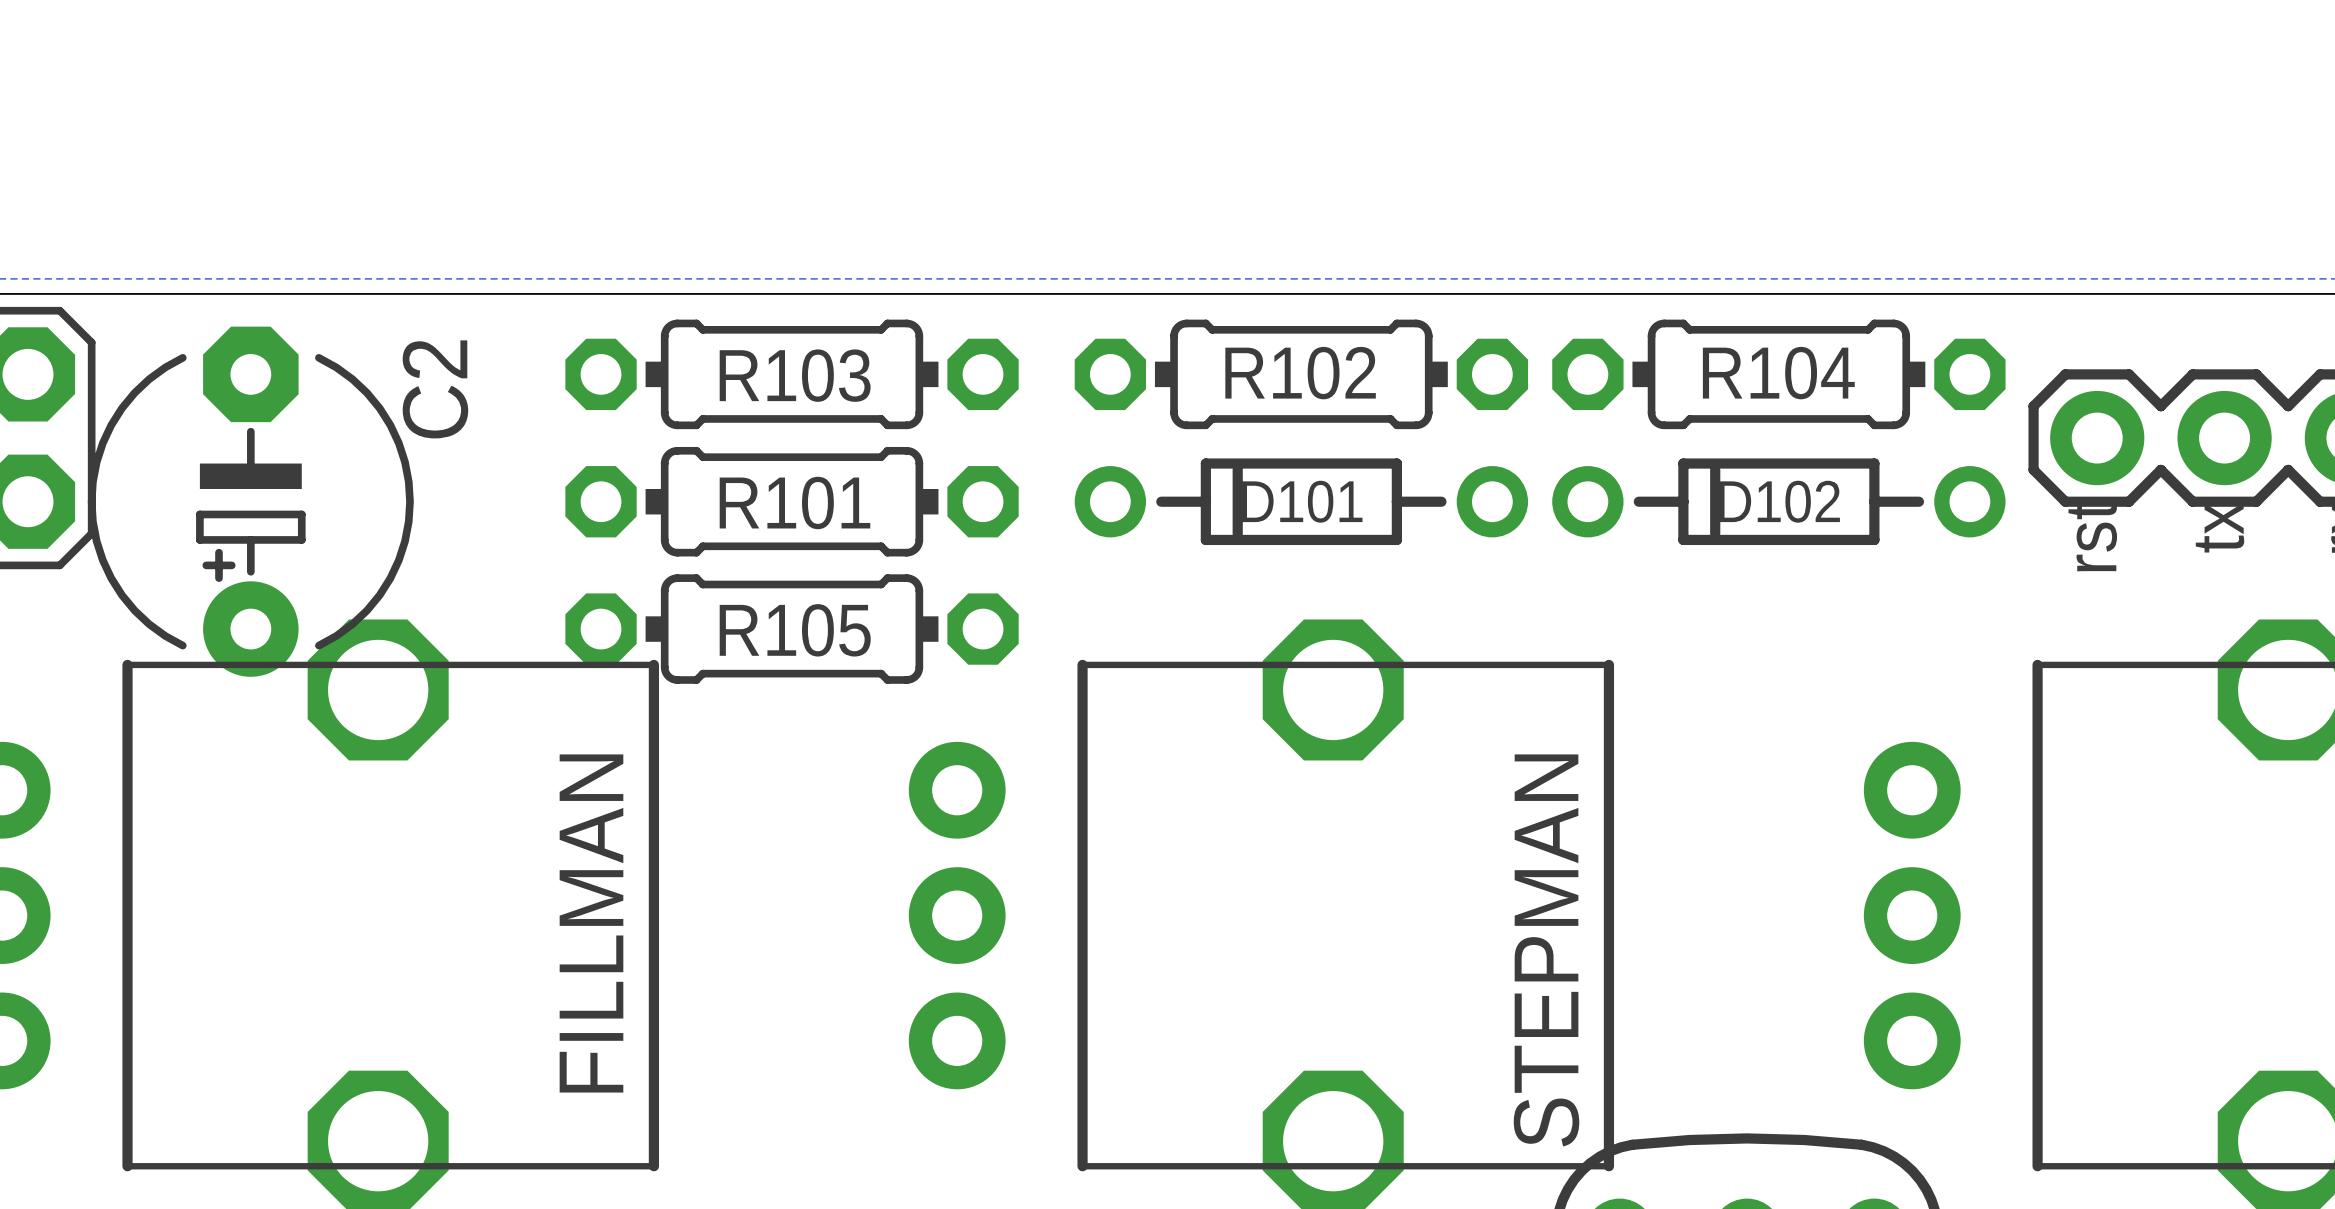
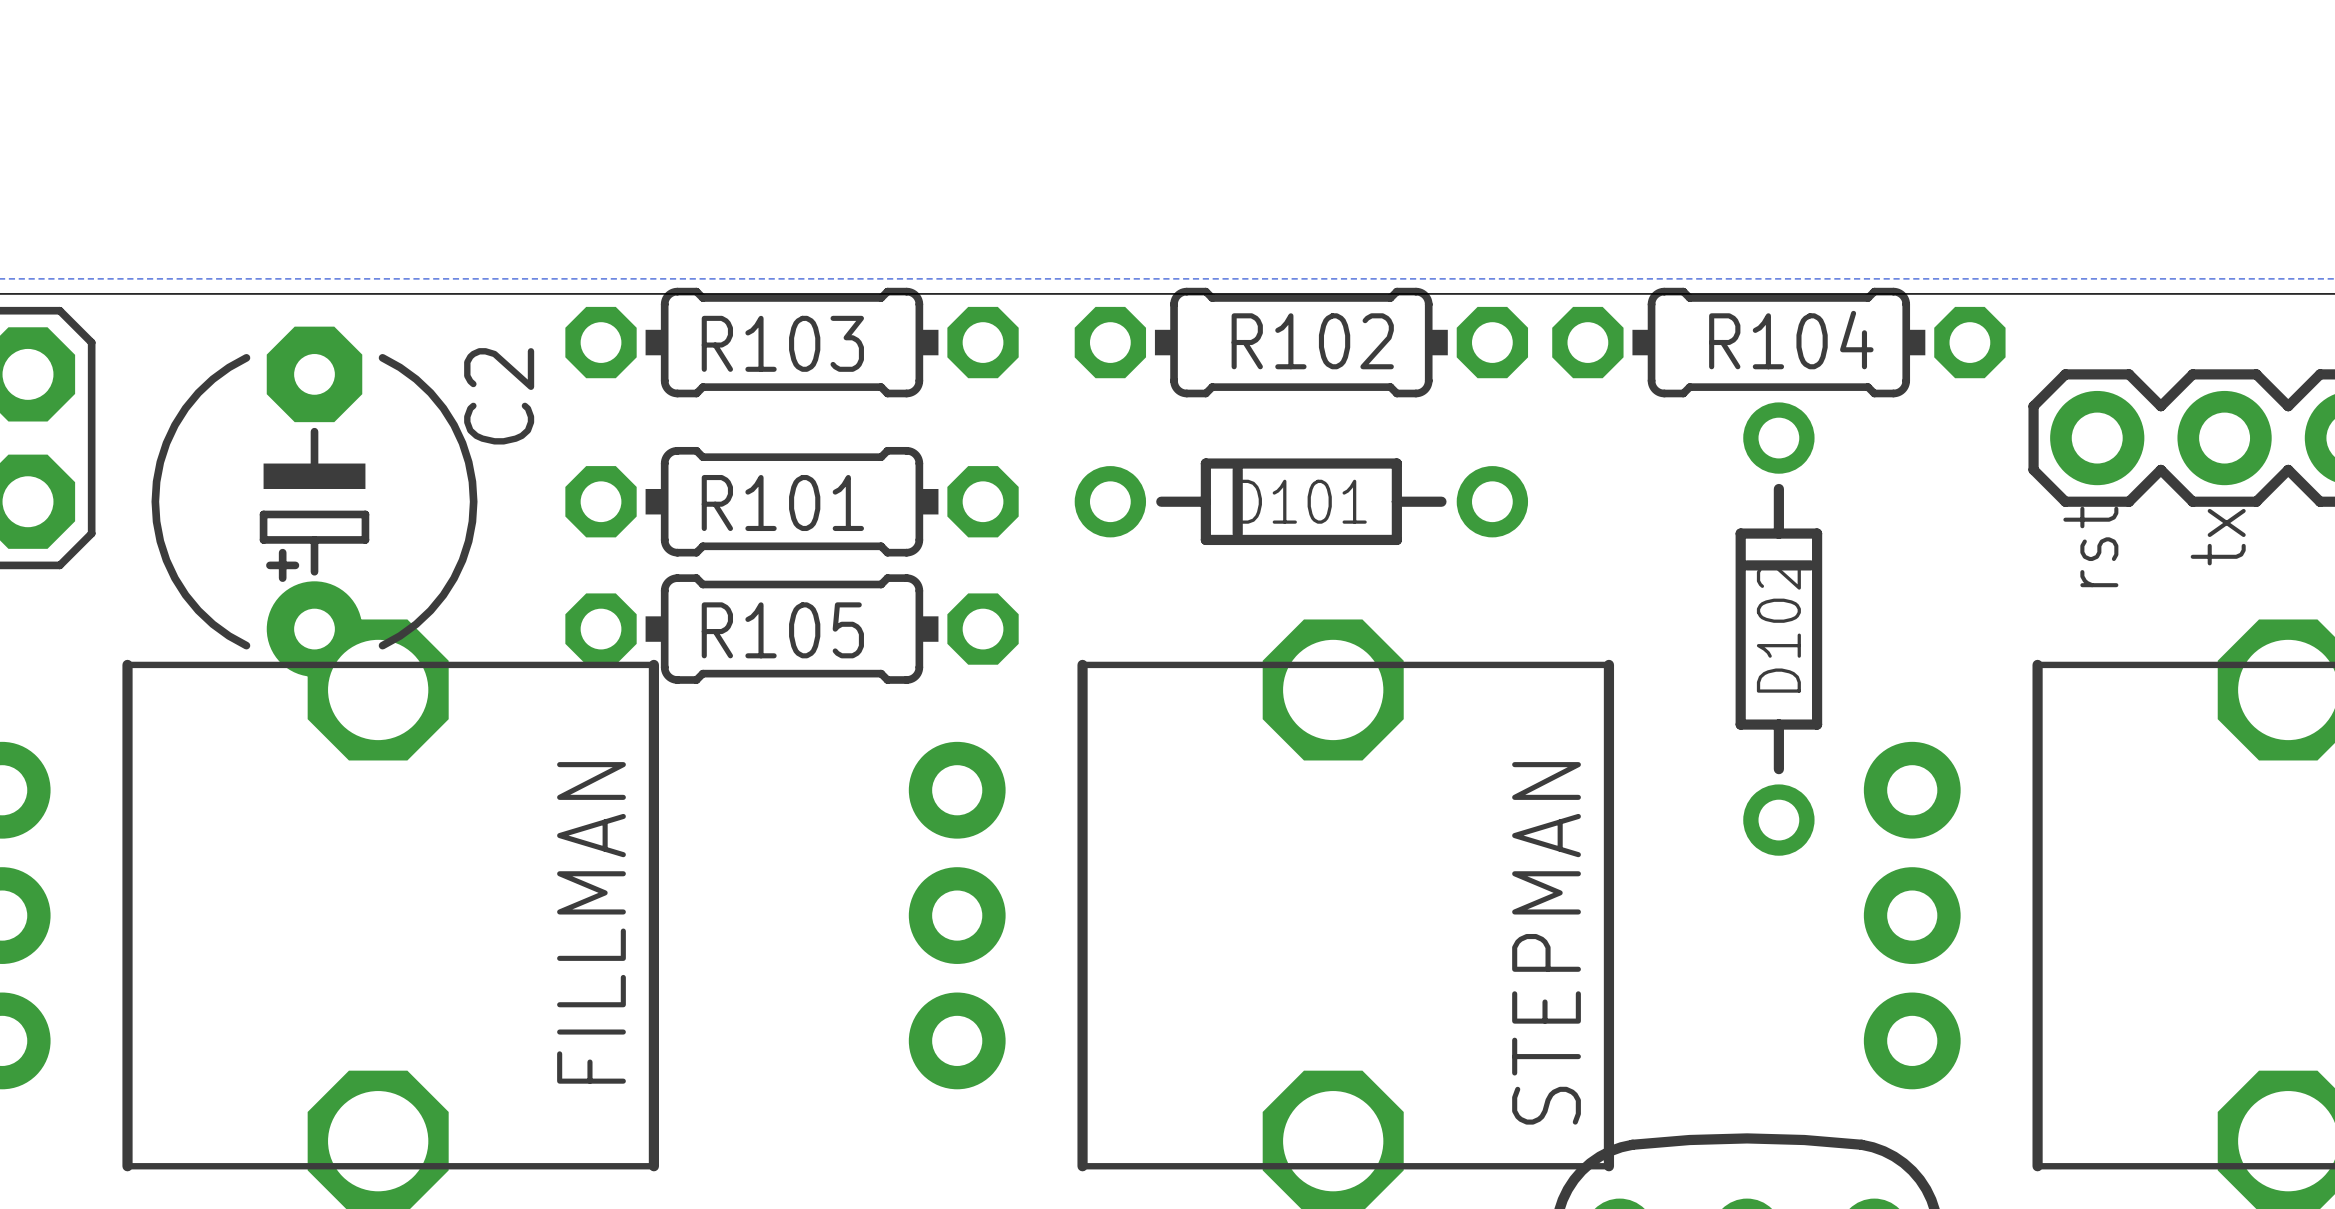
R103 position: (792, 374) -> (792, 342)
R102 position: (1301, 374) -> (1301, 342)
R104 position: (1778, 374) -> (1778, 342)
C2 position: (250, 501) -> (314, 501)
D102 rotation: 0° (1778, 501) -> 90° clockwise (1778, 629)

